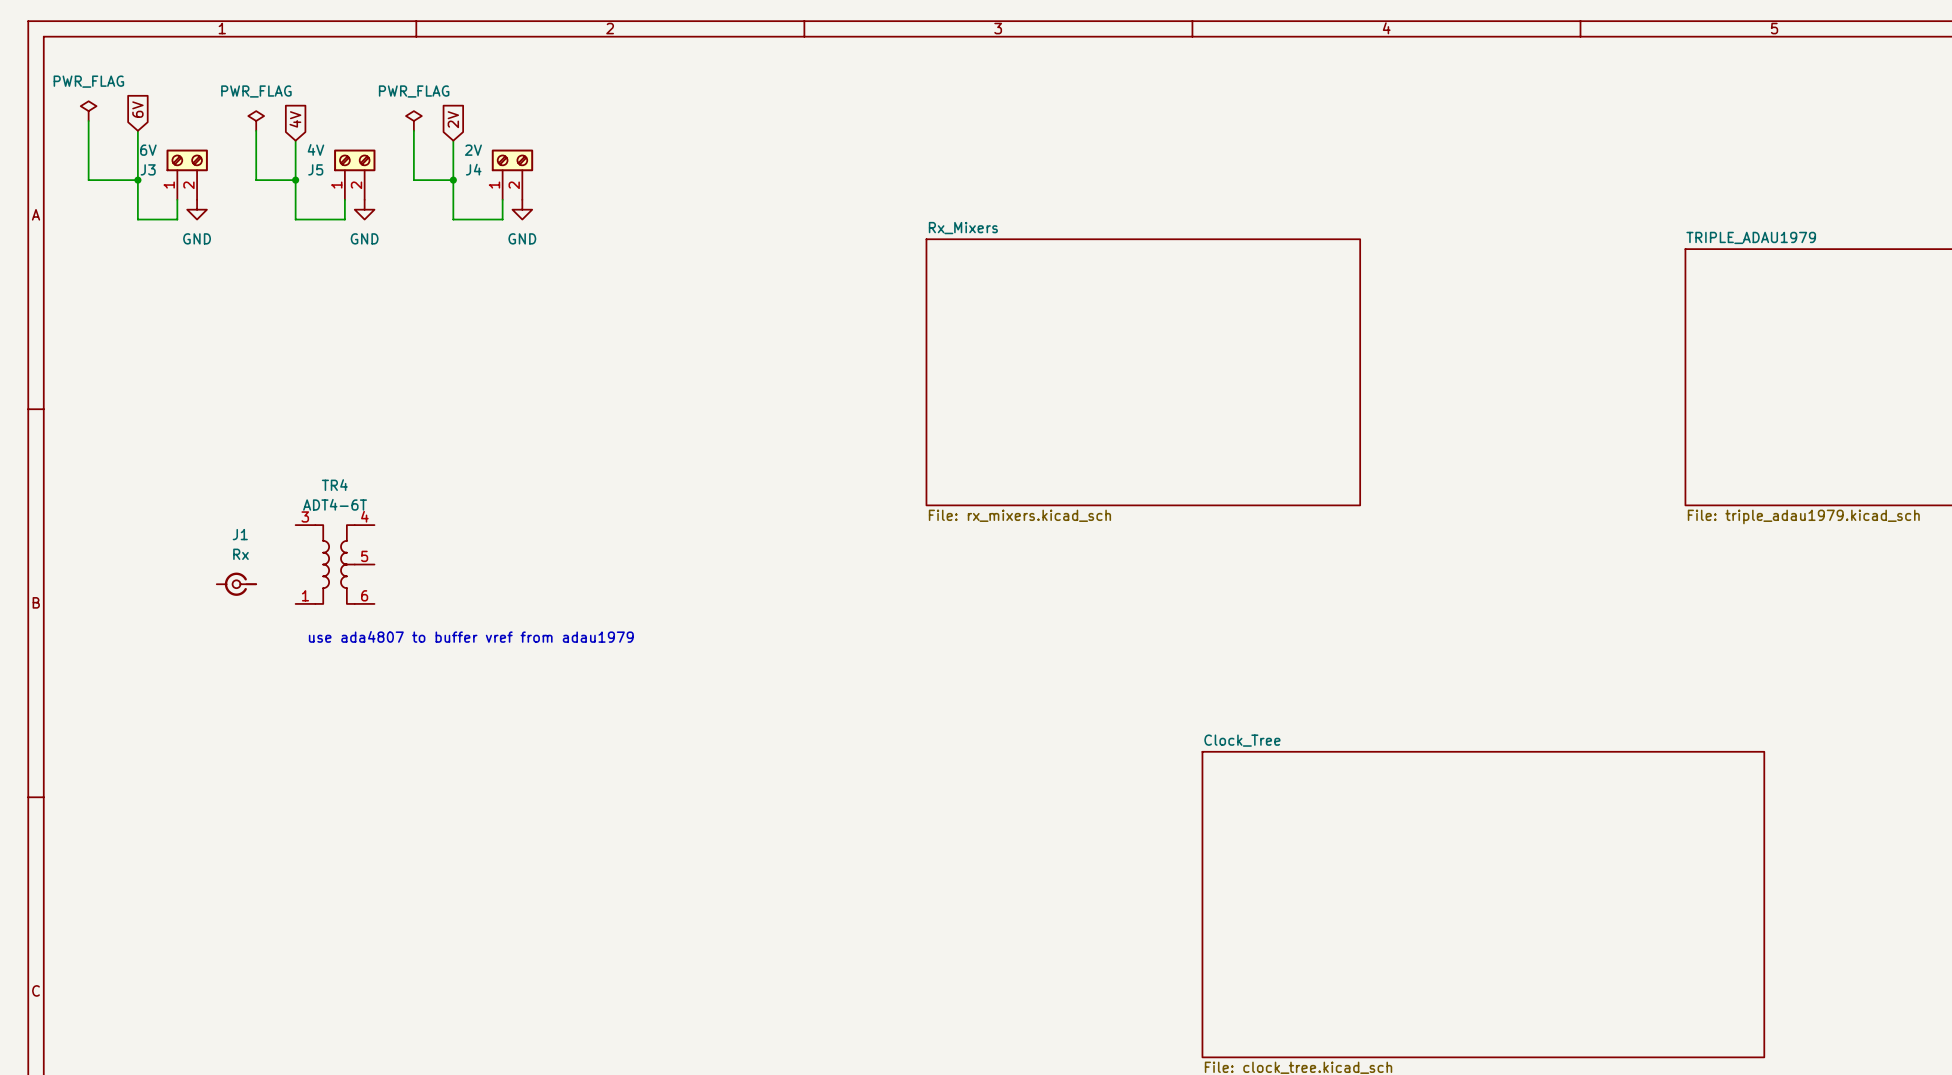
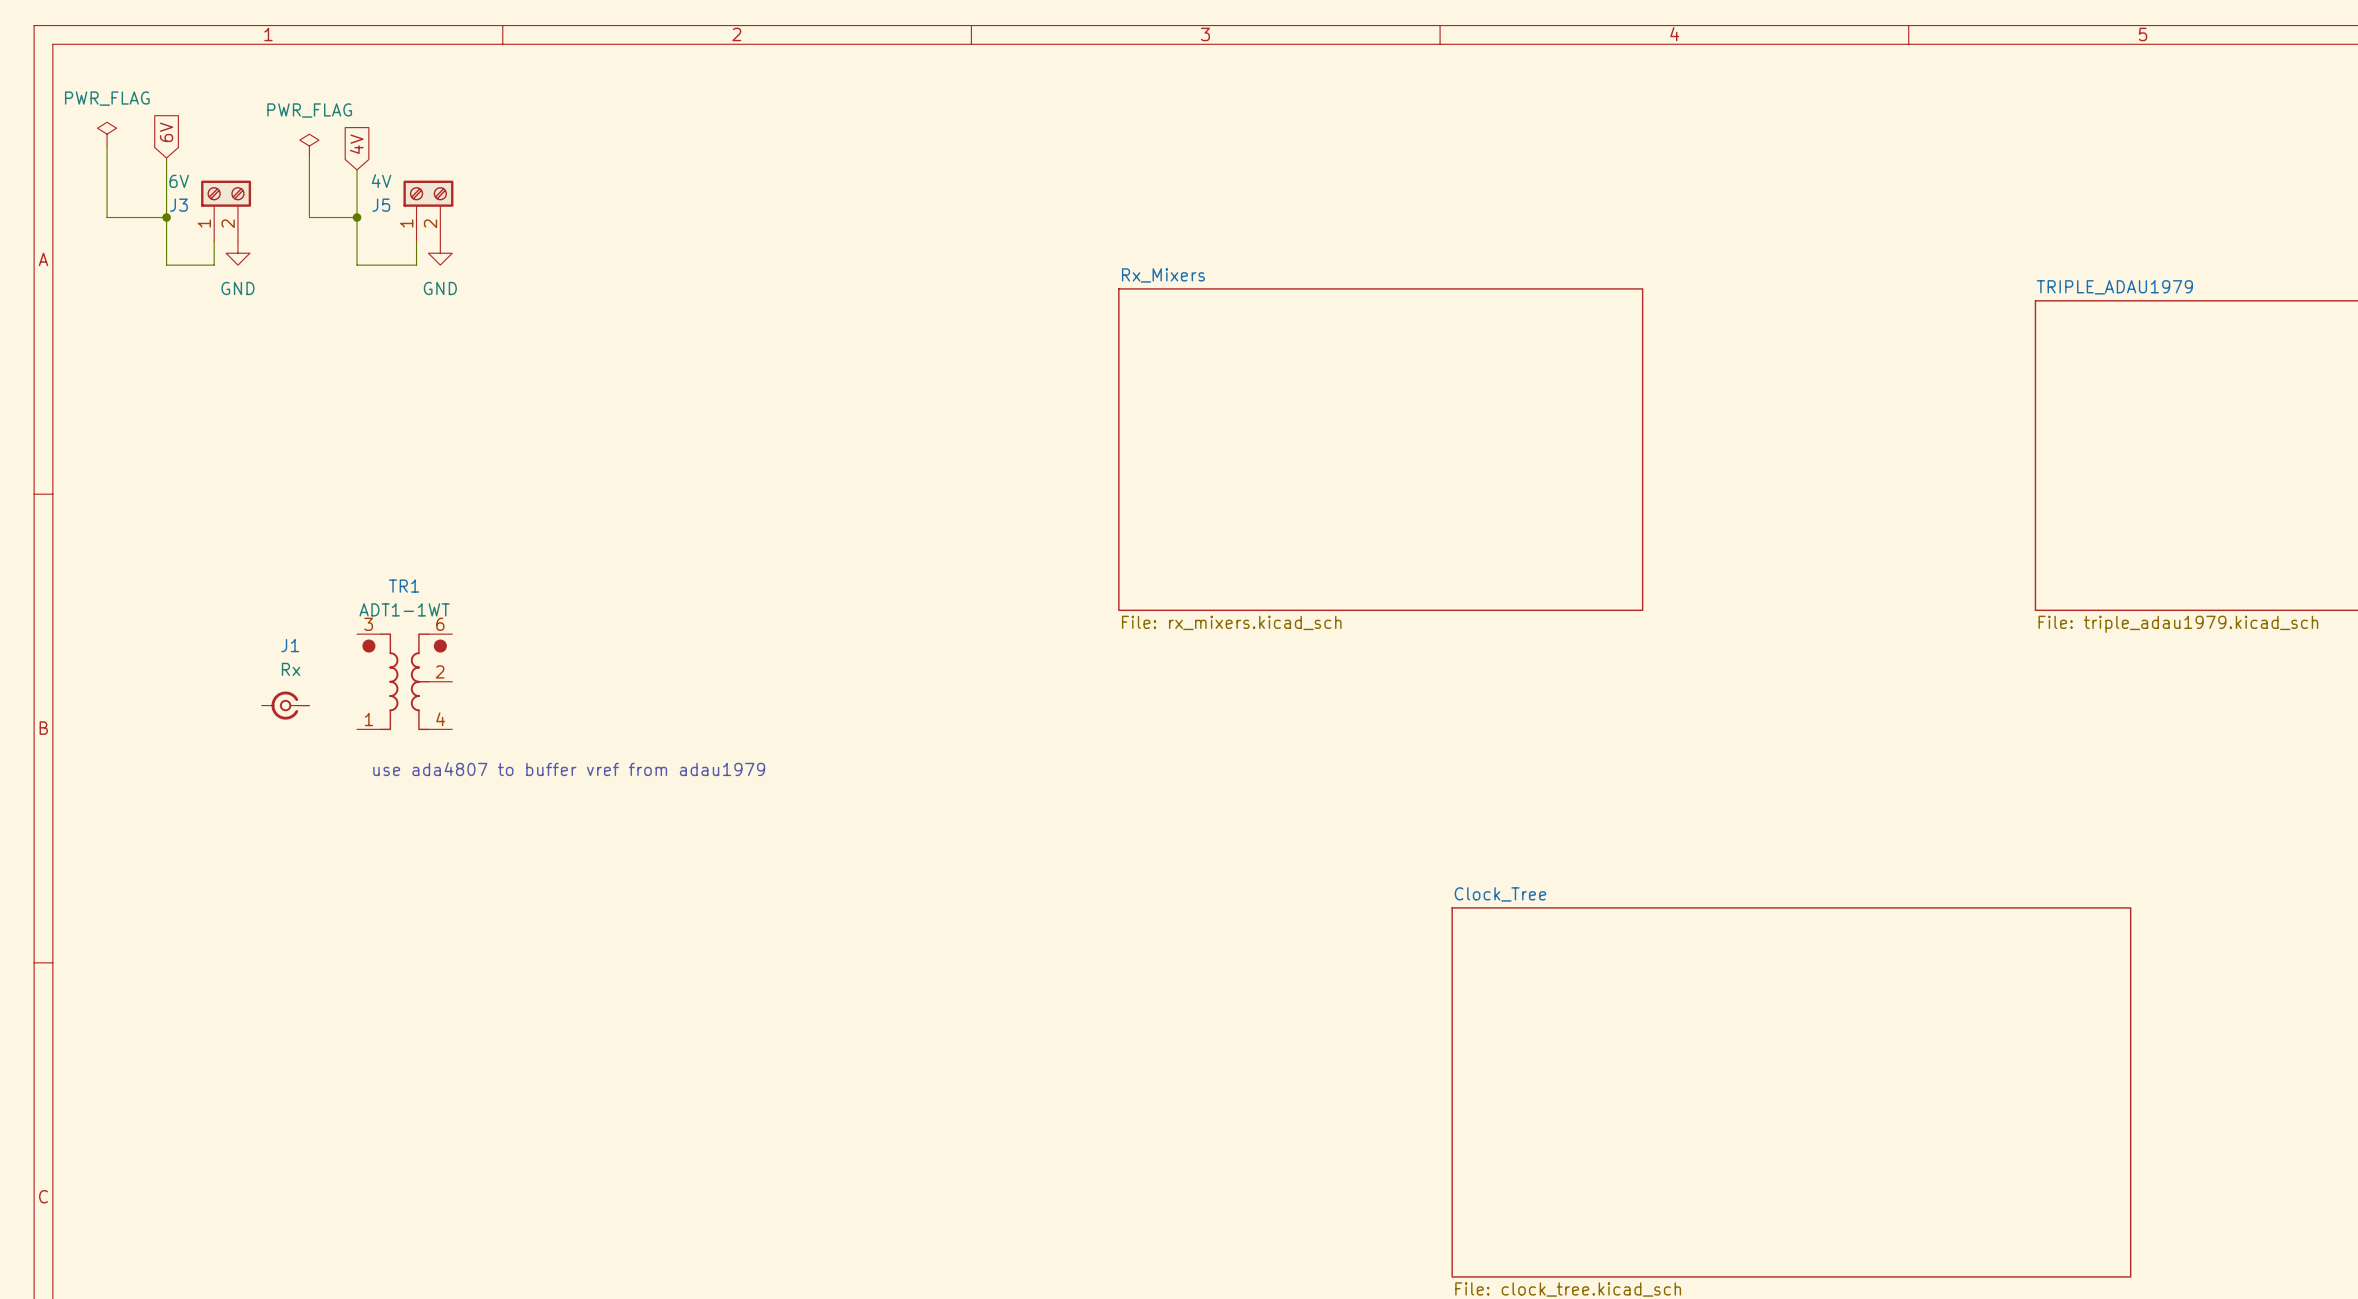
global label: 2V (453, 119) -> none
power symbol: PWR_FLAG (413, 120) -> none
wire: (413, 130) (413, 180) (453, 180) -> none
wire: (453, 140) (453, 219) (502, 219) (502, 199) -> none
J4: 2V (512, 174) -> none
junction: (453, 180) -> none
power symbol: GND (522, 209) -> none
TR4: ADT4-6T (335, 564) -> none
TR1: none -> ADT1-1WT (404, 681)

